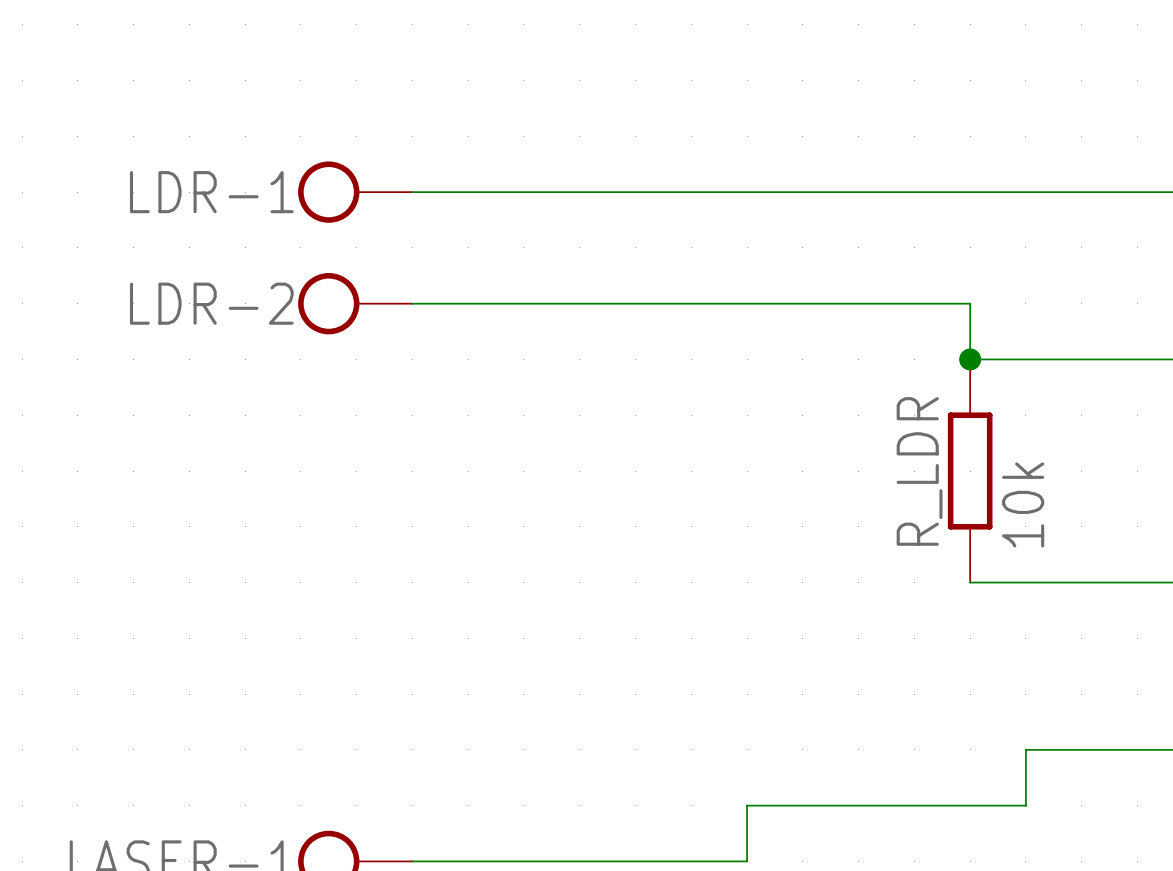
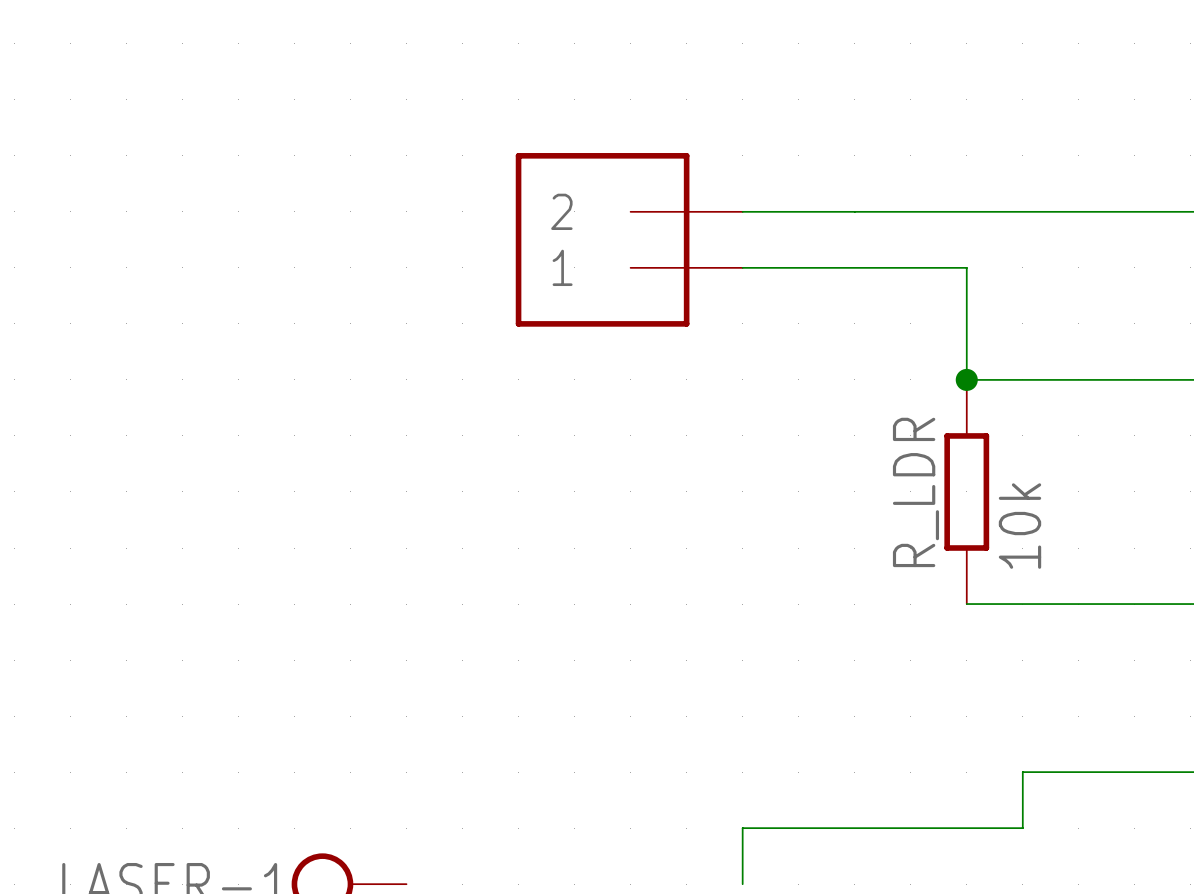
LDR-1: (355, 192) -> none
wire: (412, 192) (747, 192) -> none
part: none -> (629, 239)
LDR-2: (355, 303) -> none
wire: (412, 303) (970, 303) -> (742, 267) (966, 267) (966, 323)
wire: (412, 861) (747, 861) -> none

